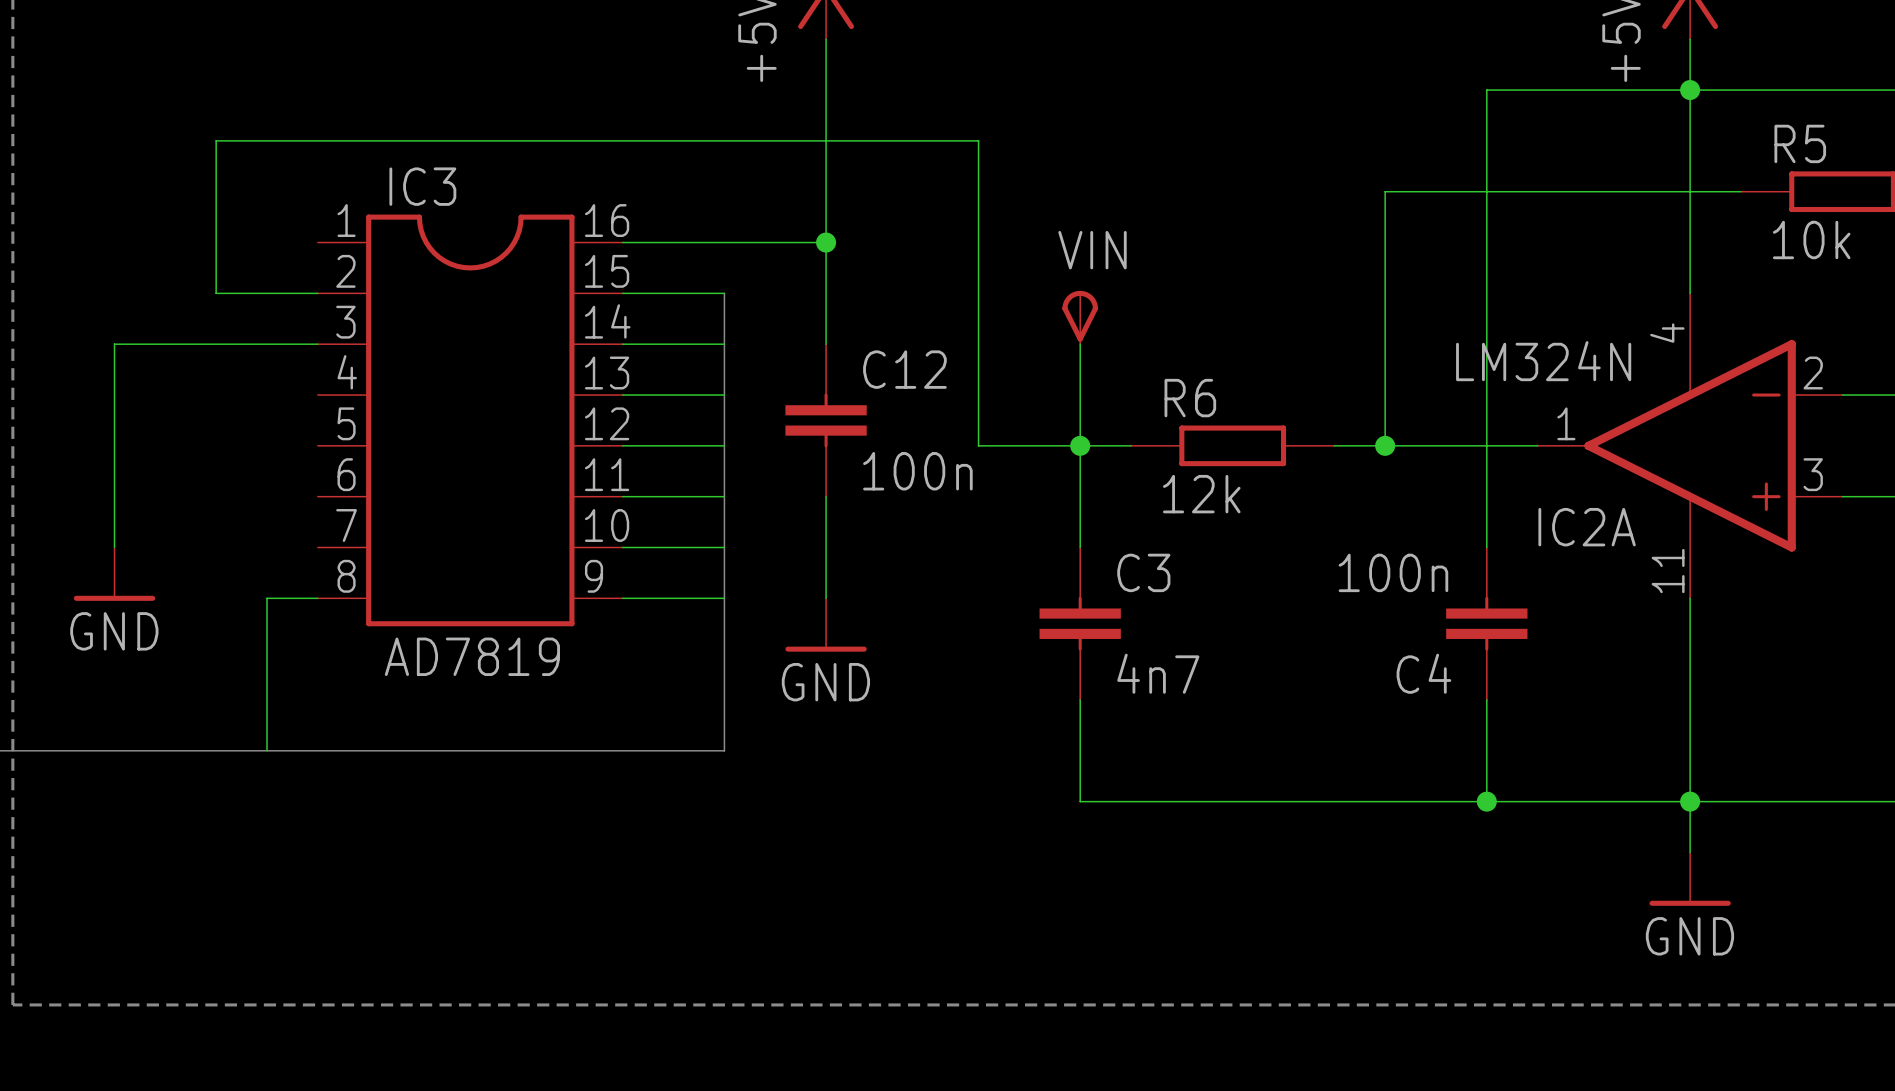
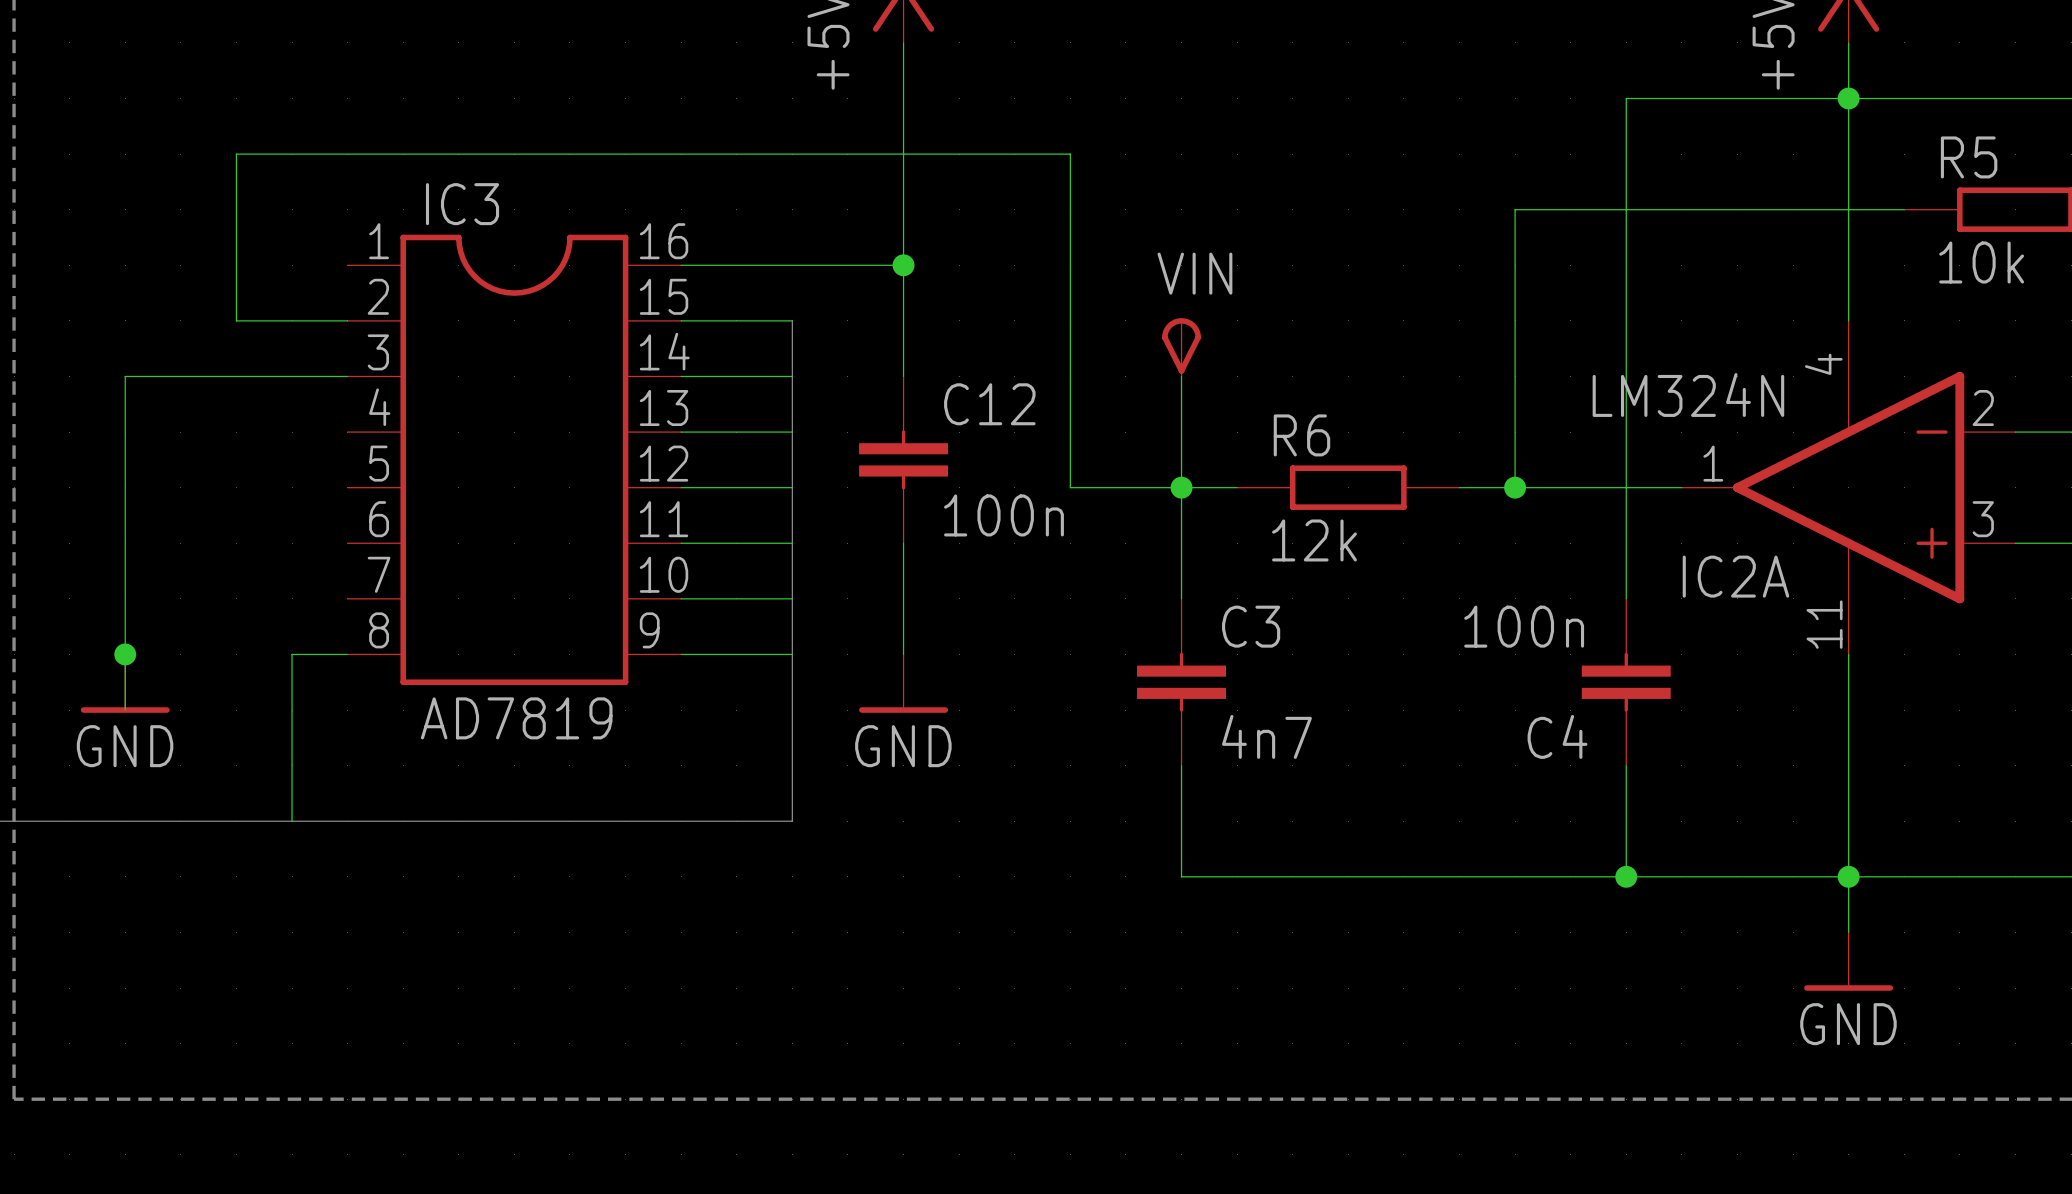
power symbol position: GND (114, 574) -> GND (125, 683)
junction: none -> (125, 654)

